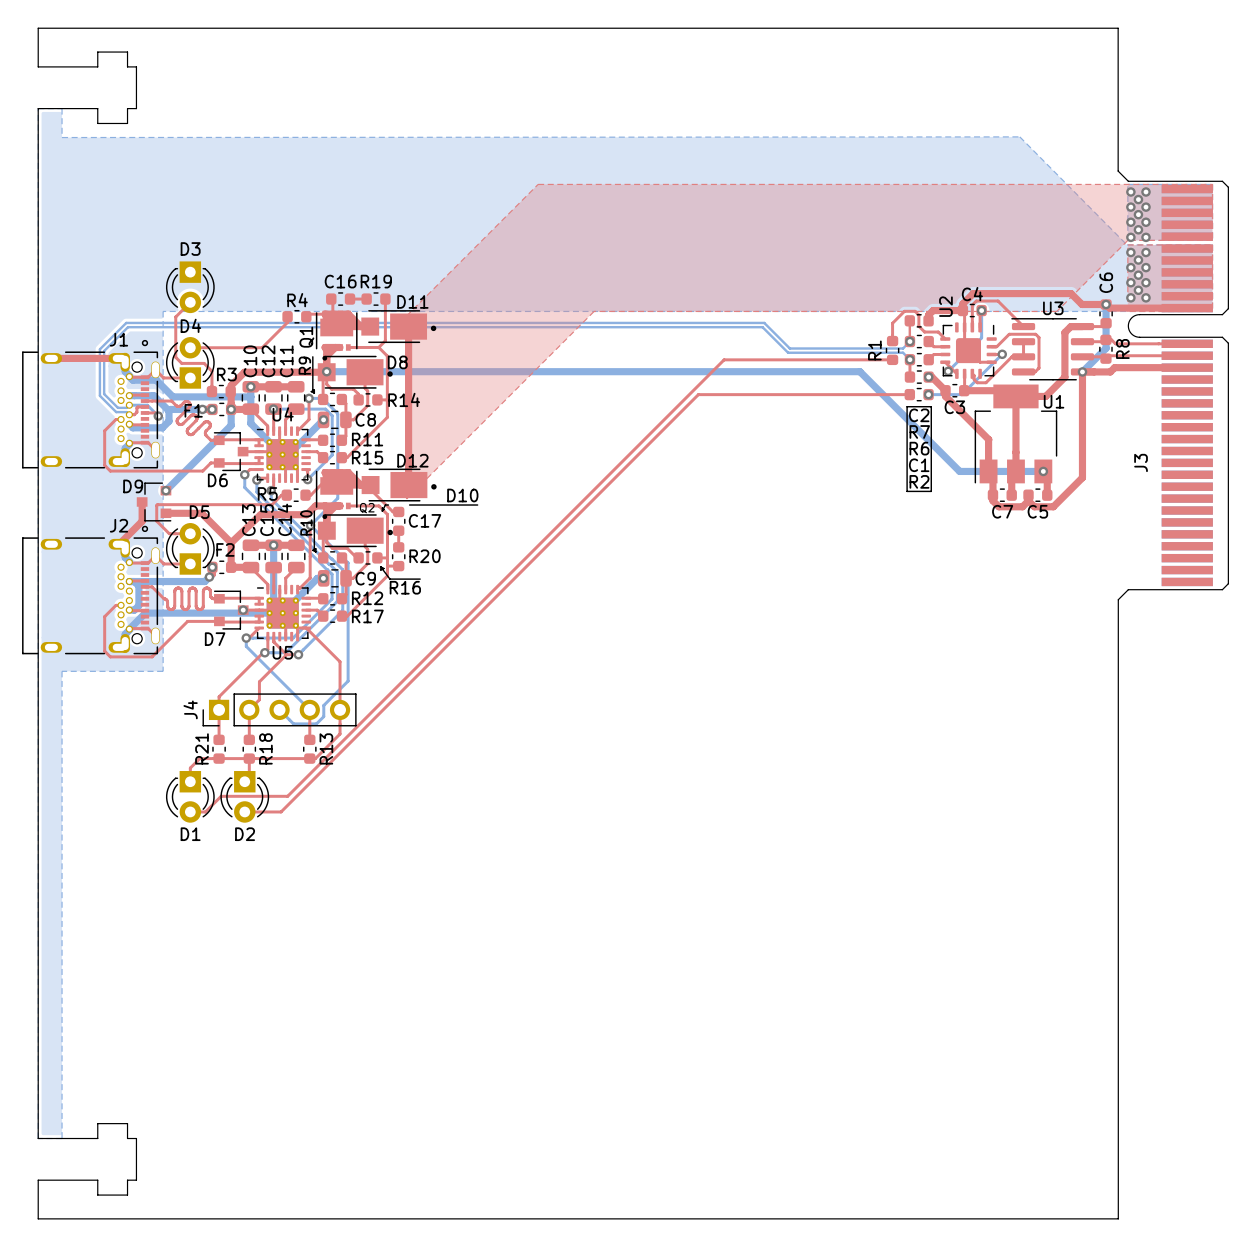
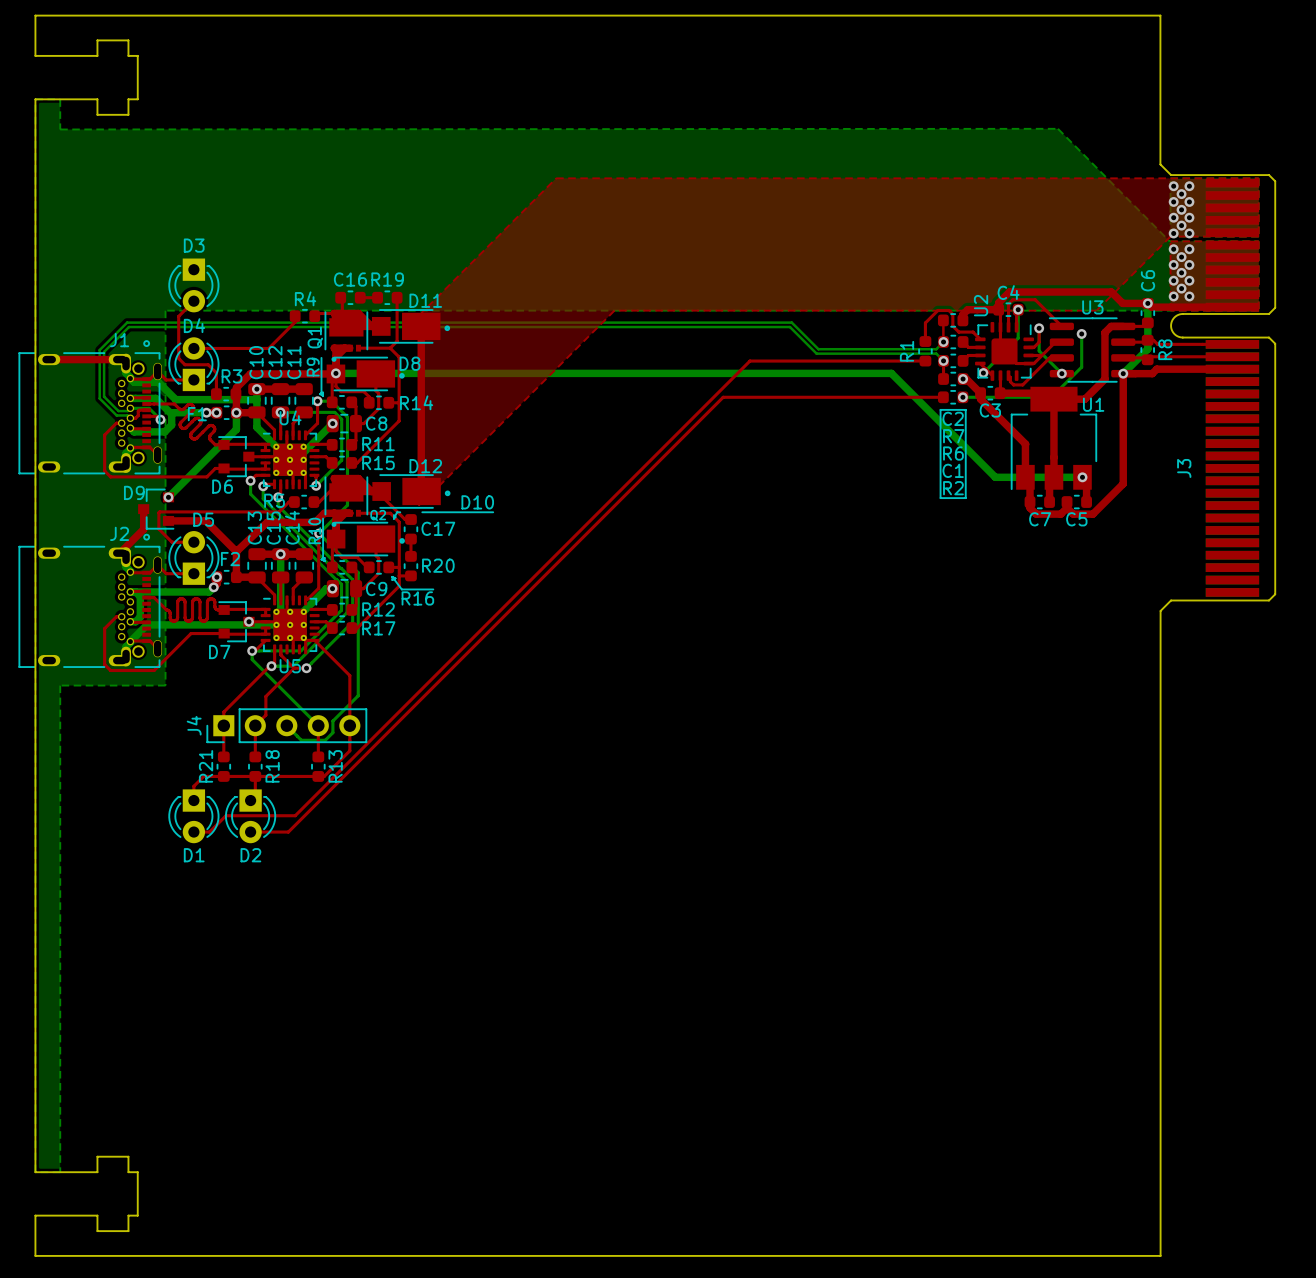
bottom track: none -> (1039, 328) (1039, 350) (1061, 373)
via: none -> (1039, 328)
via: none -> (1081, 333)
top track: (1001, 341) (1009, 334) (1035, 334) (1039, 337) (1039, 368) (1035, 371) (1023, 371) -> (1039, 342) (1039, 328)
top track: (1023, 341) (1023, 356) -> (1061, 342) (1055, 342) (1033, 363) (1028, 363)
bottom track: (1002, 354) (961, 394) -> (1081, 333) (1081, 367) (1051, 397) (997, 397)
via: (1002, 354) -> none
via: none -> (1061, 373)

